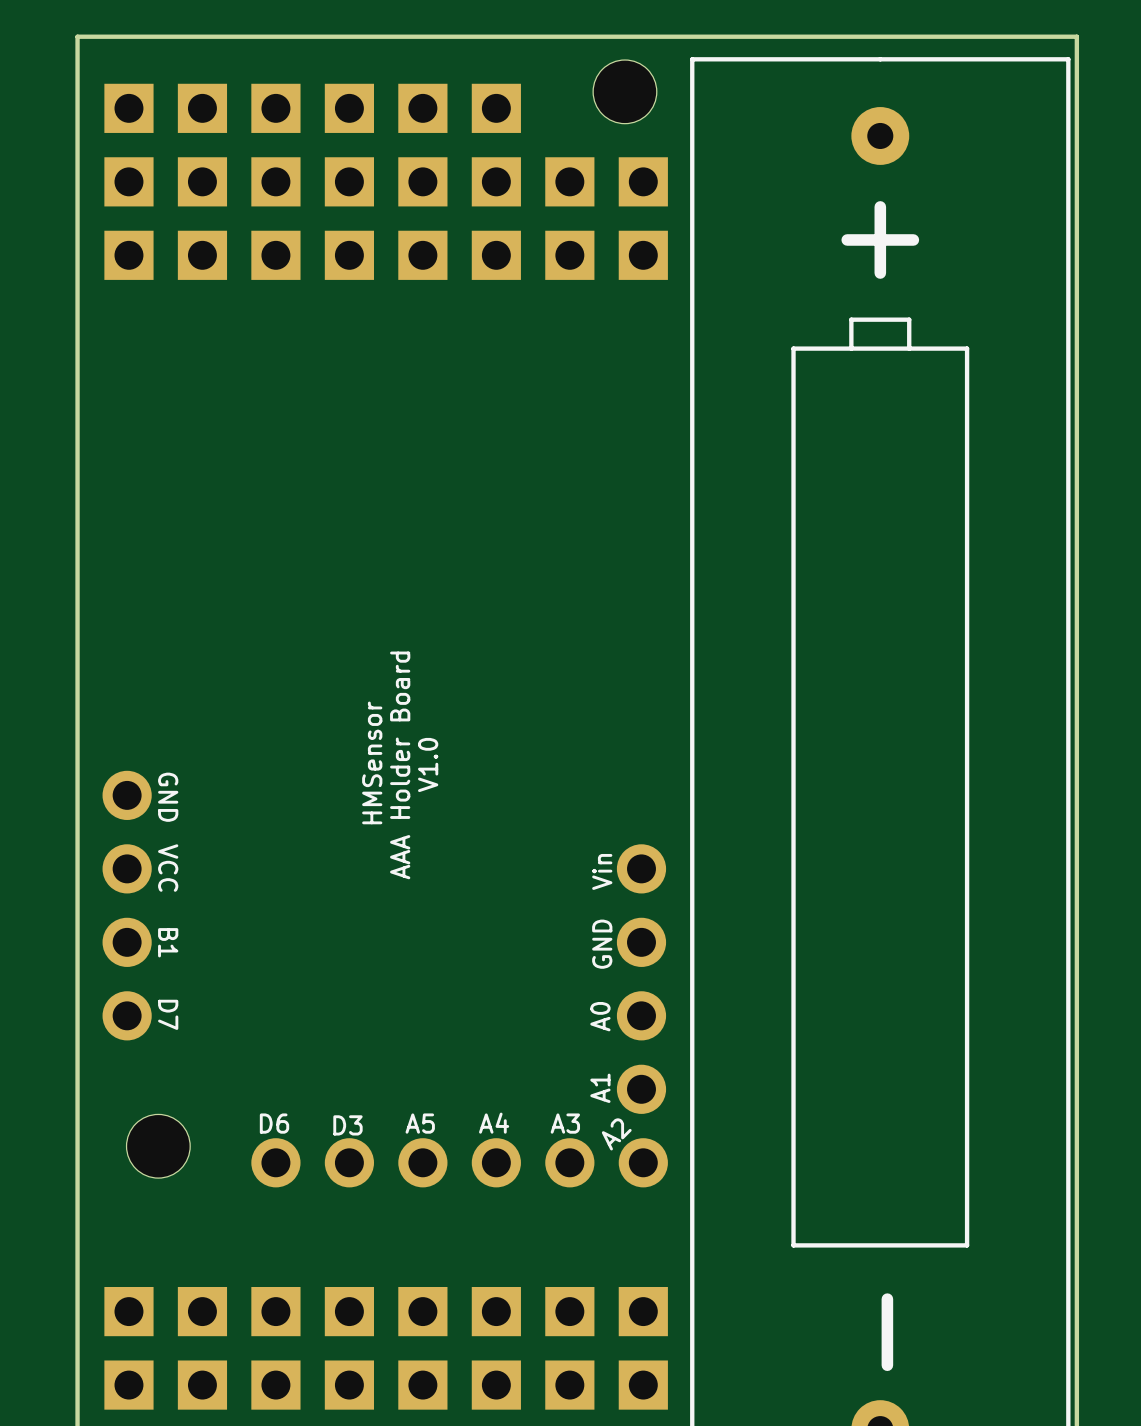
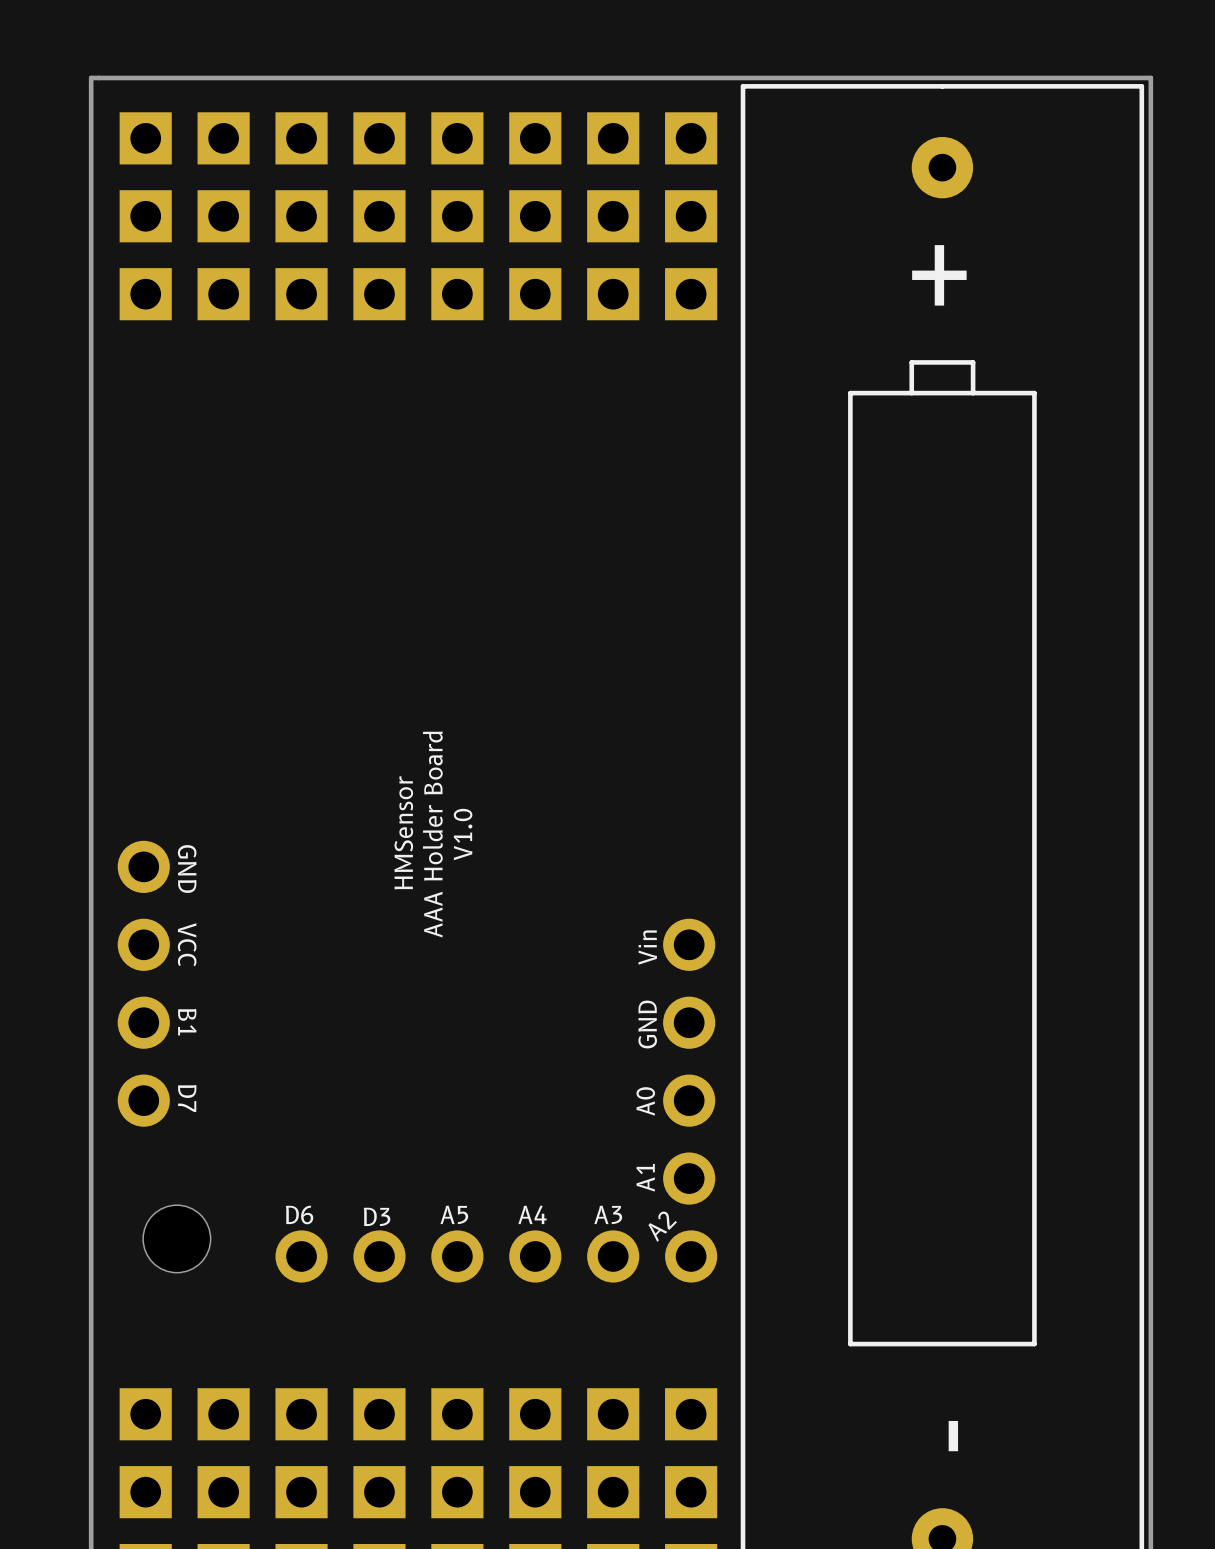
board edge: (77, 51) (77, 36) (1076, 36) (1076, 51) -> (91, 77) (1150, 77)
part footprint: [593, 60, 657, 124] -> [665, 112, 718, 165]
part: none -> (613, 138)

